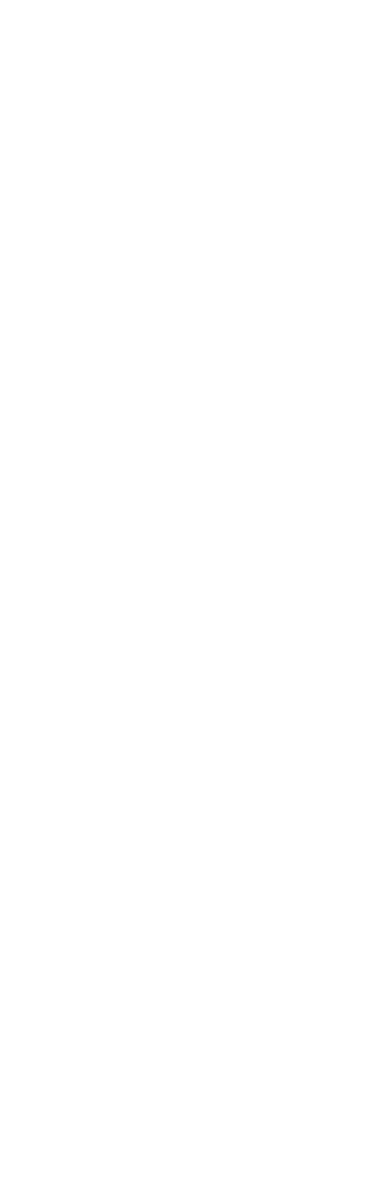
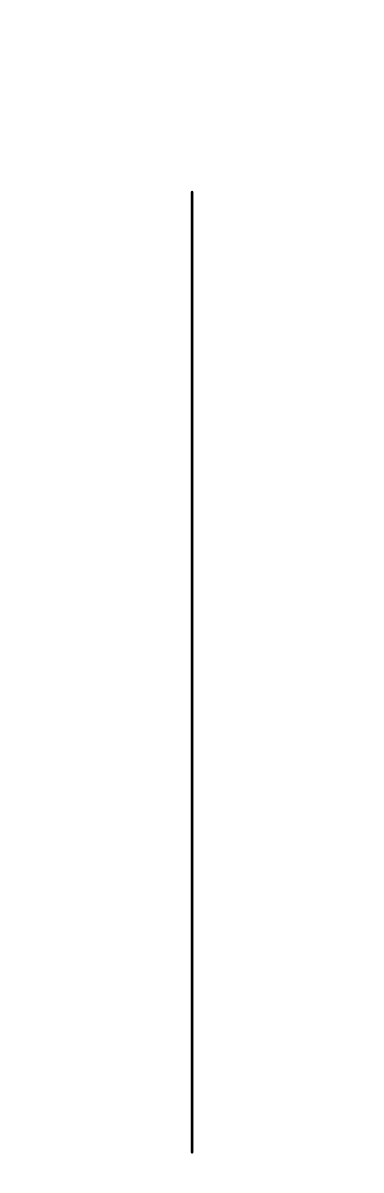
board edge: none -> (192, 192) (192, 1152)

